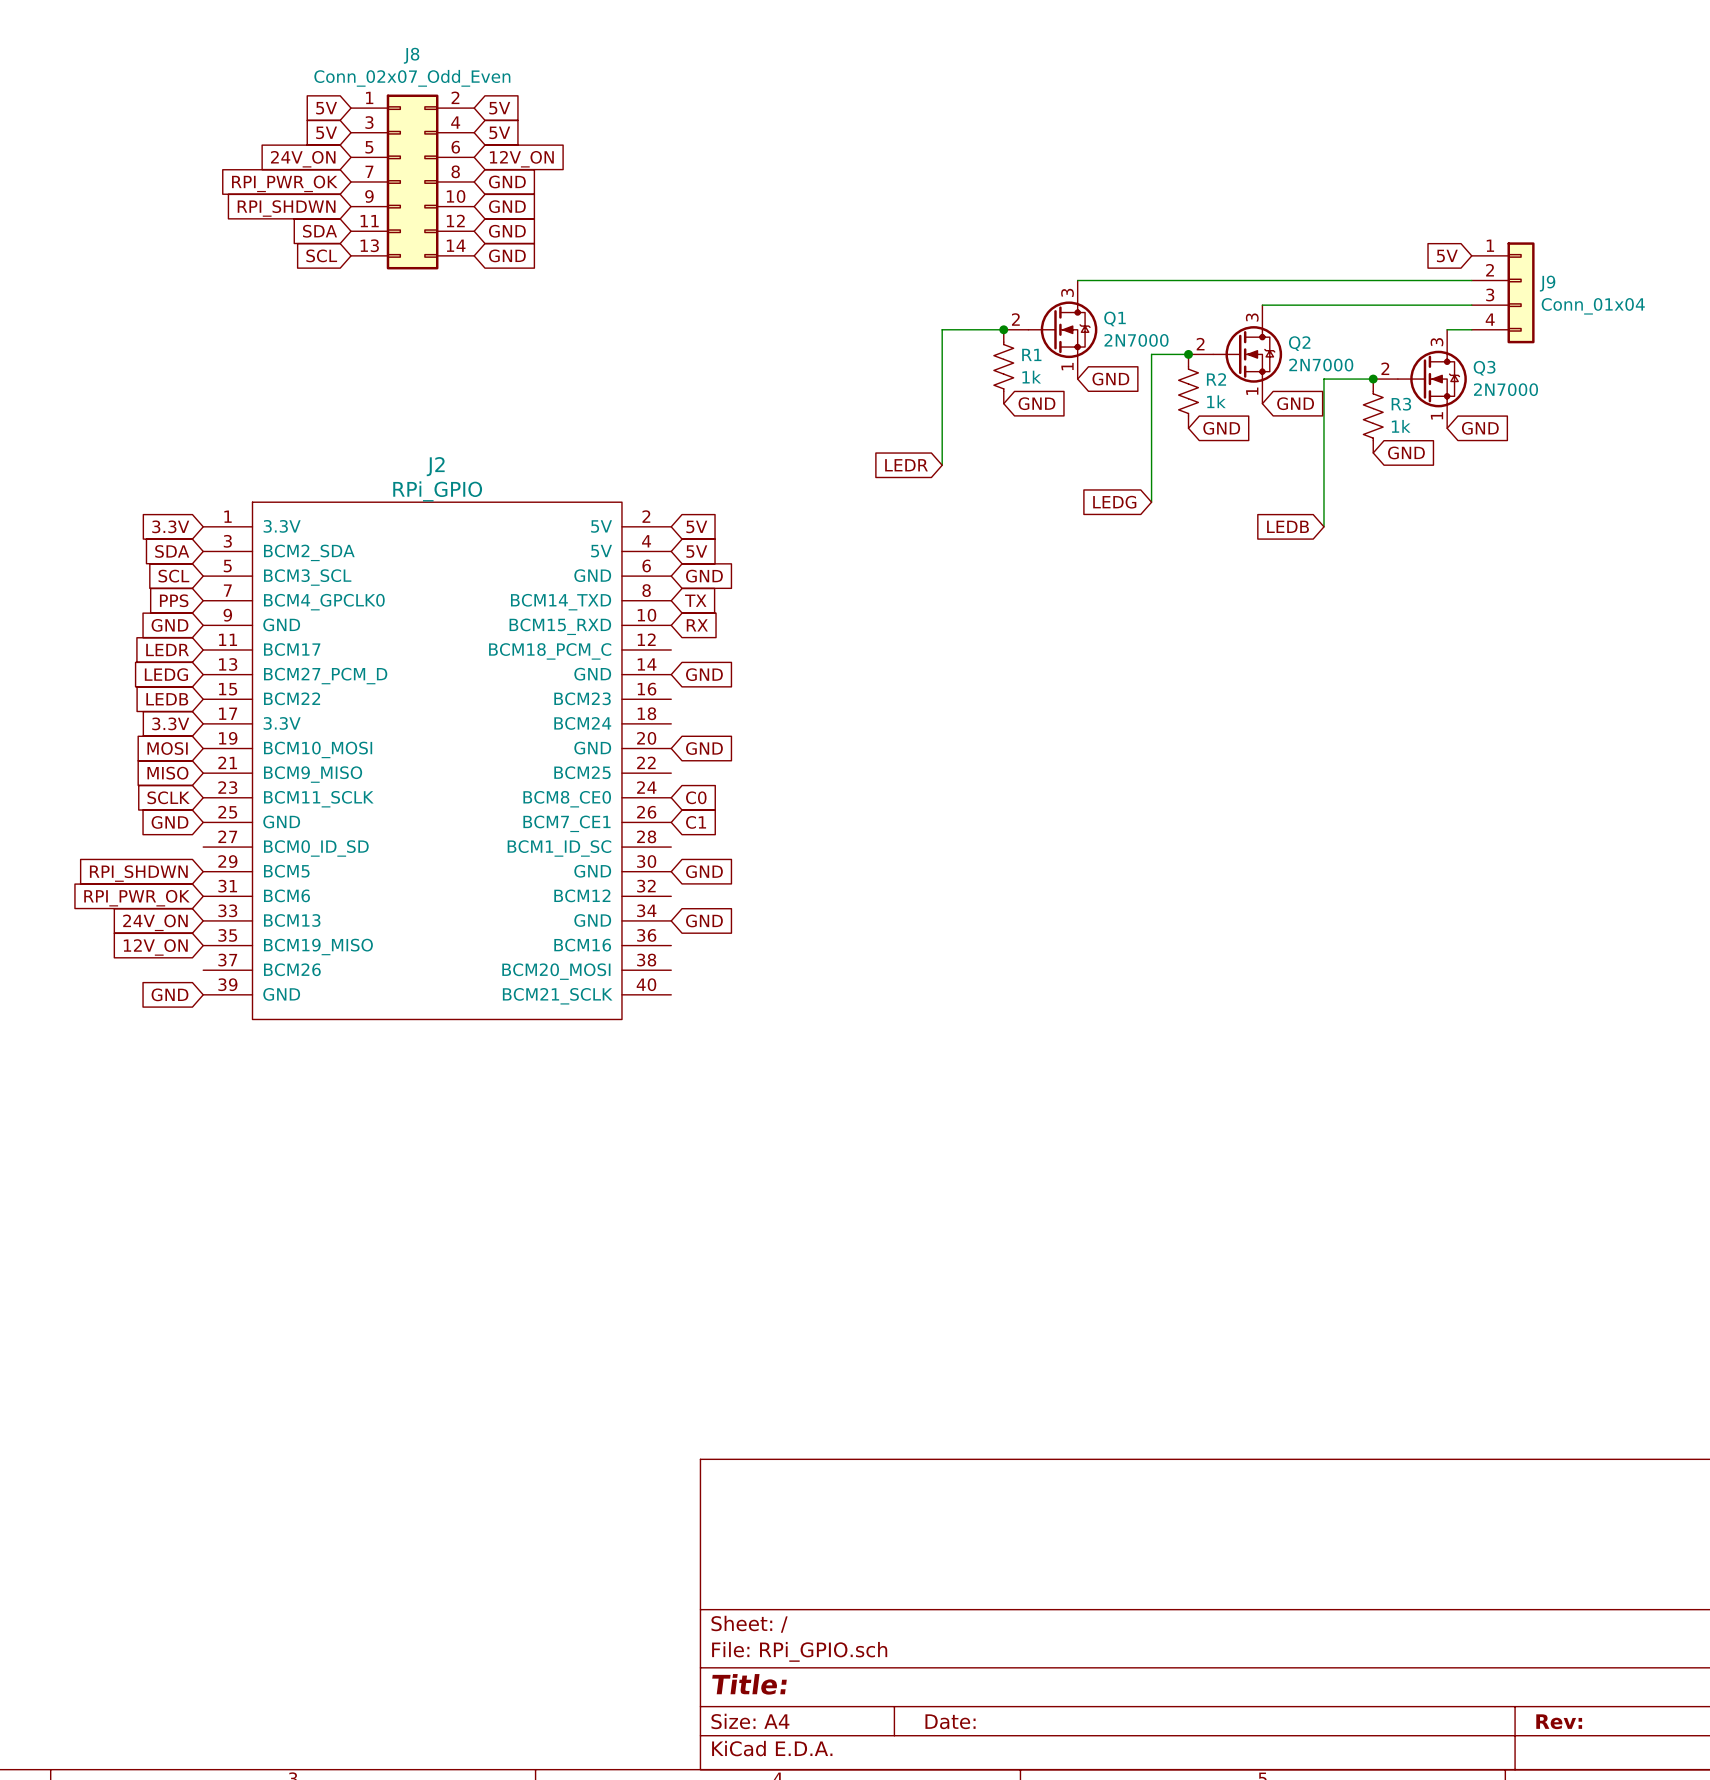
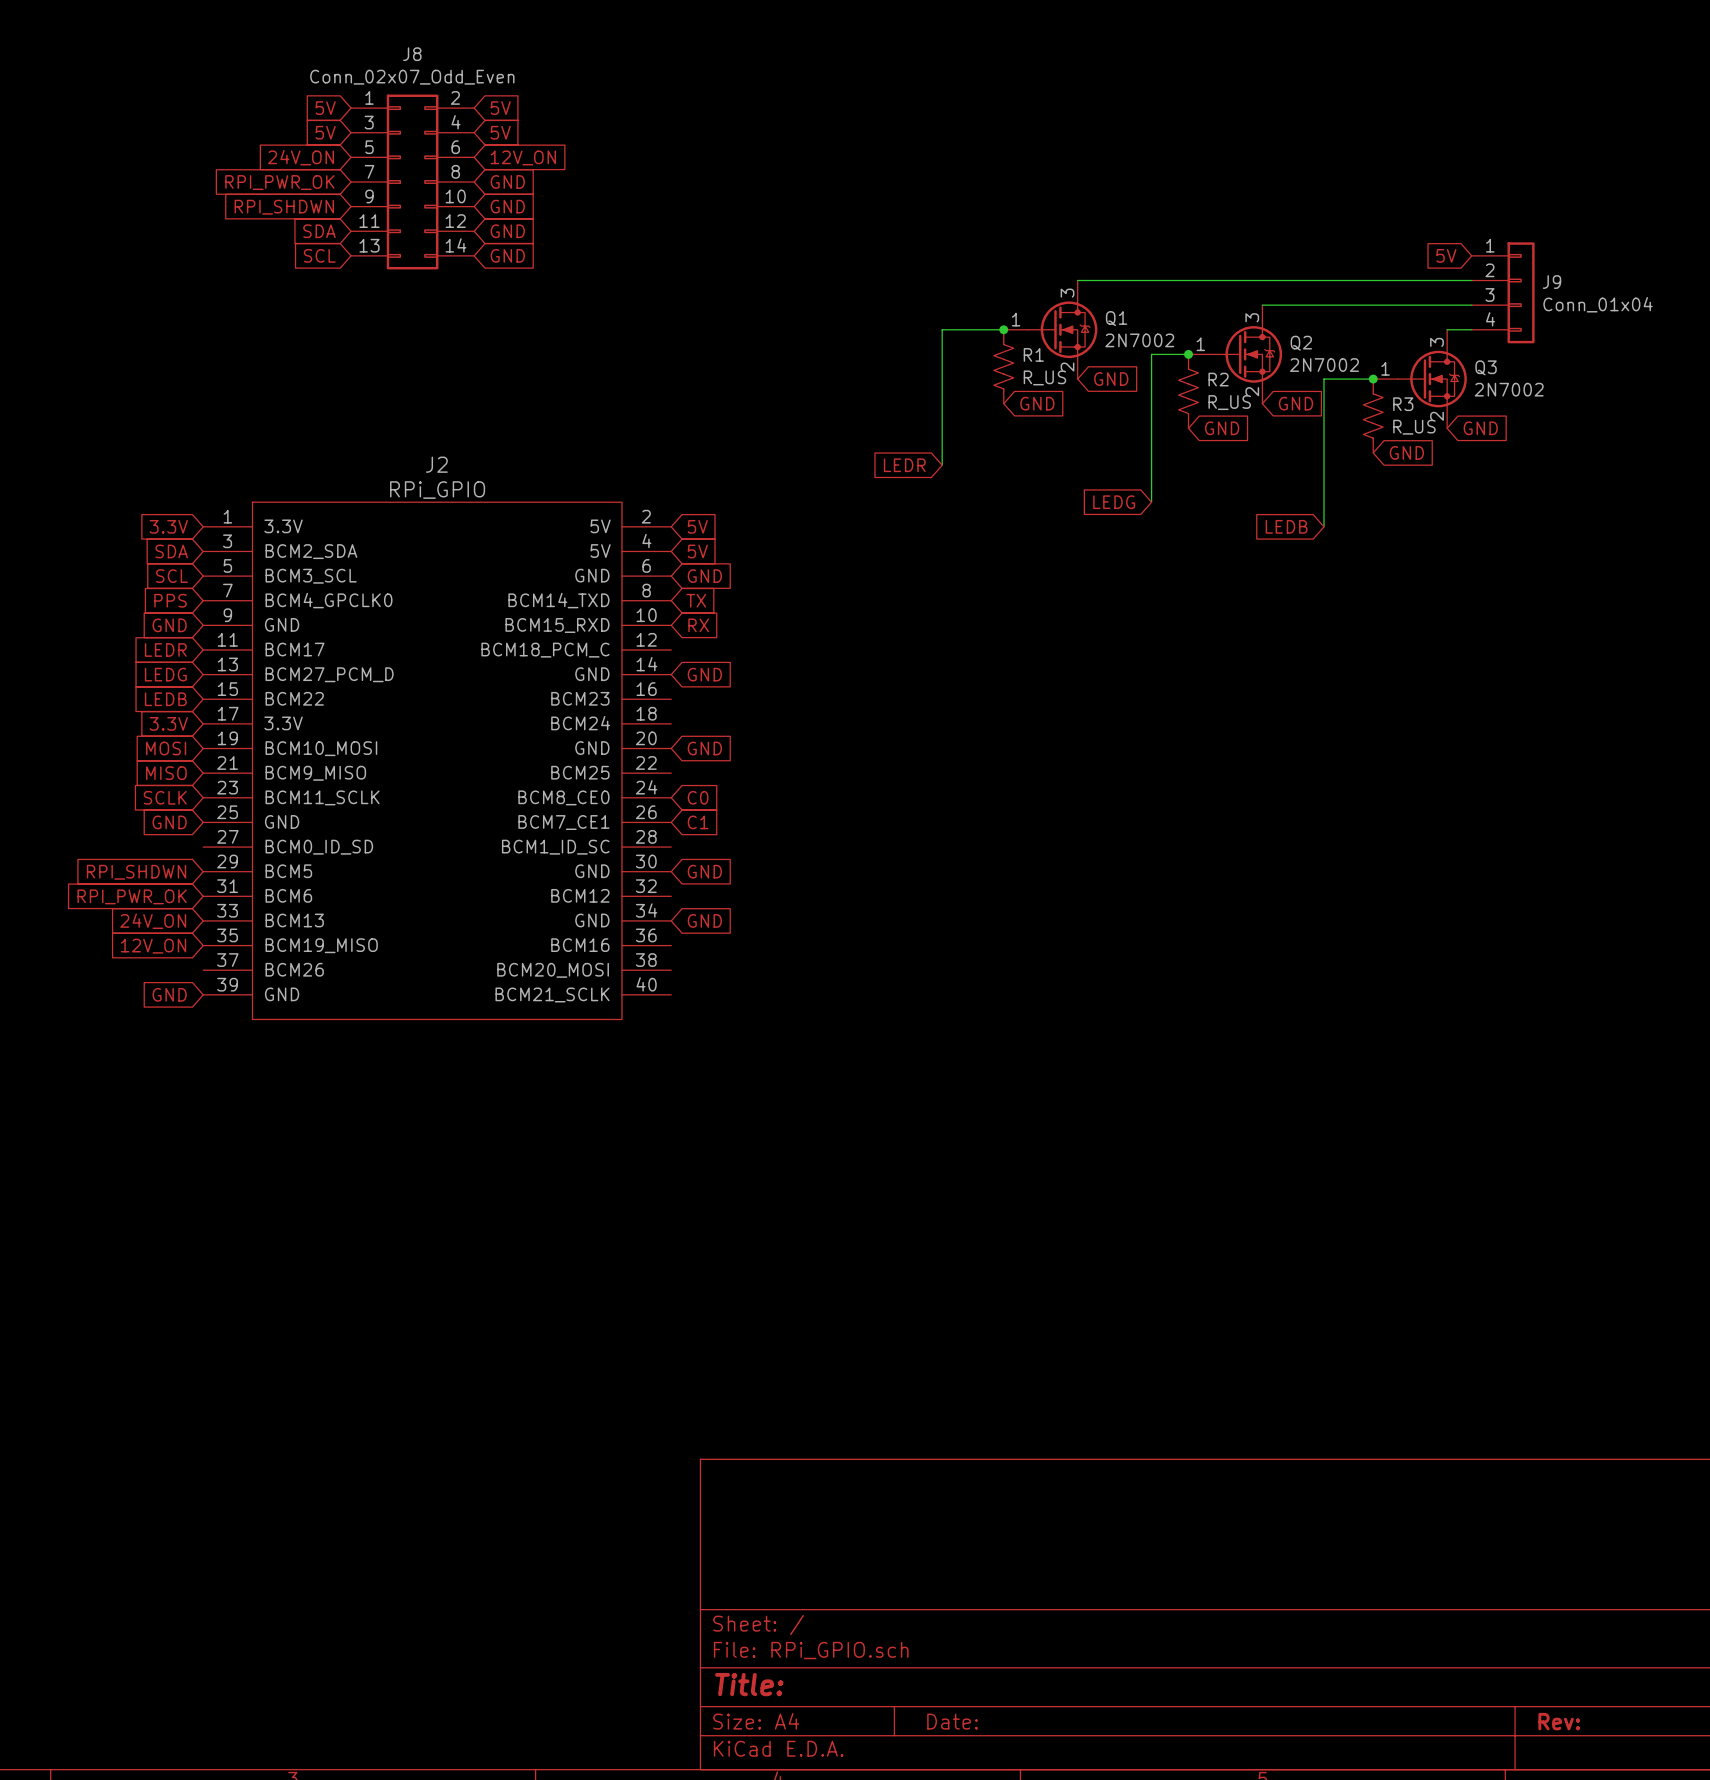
Q1 pin number: 2 (1015, 319) -> 1 (1016, 319)
Q1 value: 2N7000 (1136, 340) -> 2N7002 (1139, 340)
Q2 pin number: 2 (1200, 344) -> 1 (1200, 344)
Q2 value: 2N7000 (1321, 365) -> 2N7002 (1324, 365)
Q1 pin number: 1 (1067, 366) -> 2 (1067, 367)
Q3 pin number: 2 (1385, 368) -> 1 (1385, 368)
R1 value: 1k (1031, 377) -> R_US (1044, 377)
Q3 value: 2N7000 (1506, 389) -> 2N7002 (1509, 389)
Q2 pin number: 1 (1252, 391) -> 2 (1252, 391)
R2 value: 1k (1216, 401) -> R_US (1229, 402)
Q3 pin number: 1 (1436, 415) -> 2 (1436, 416)
R3 value: 1k (1401, 426) -> R_US (1414, 427)

